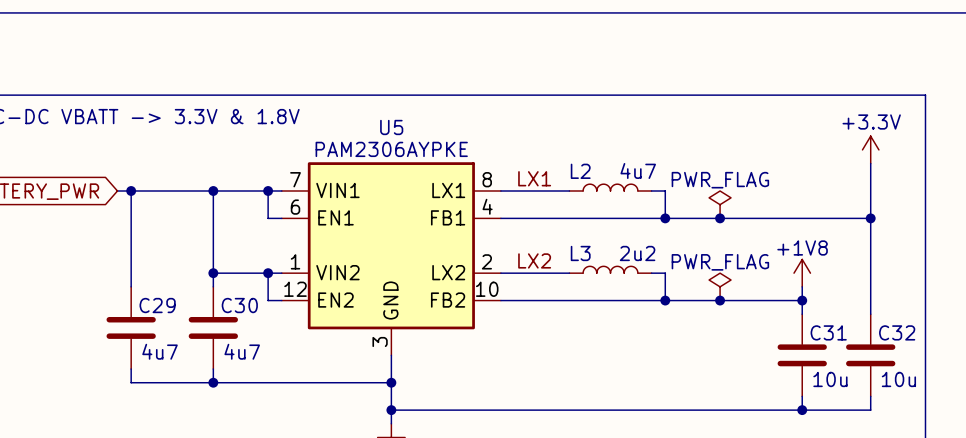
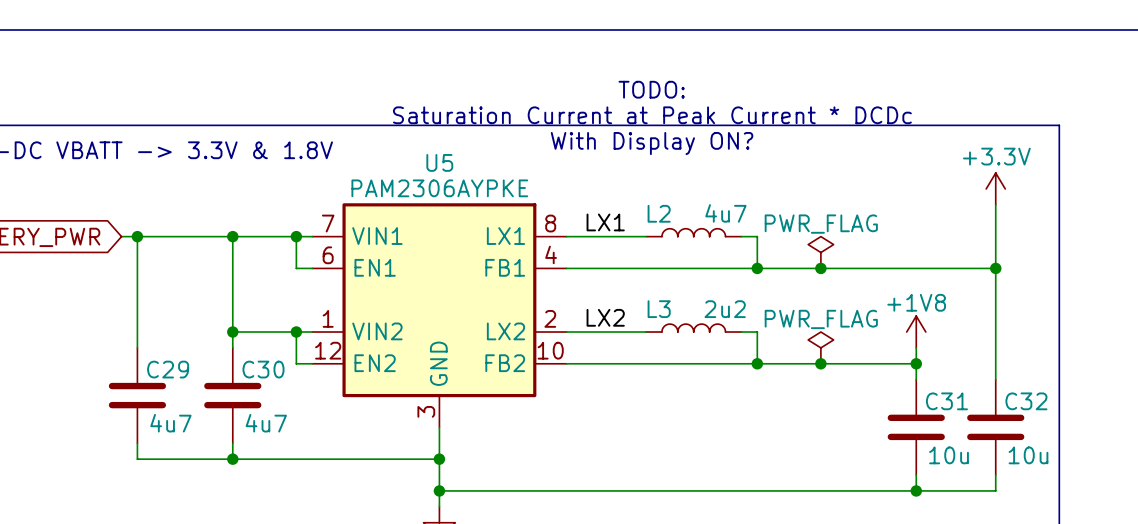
text: none -> TODO: (651, 89)
text: none -> Saturation Current at Peak Current * DCDc (652, 115)
text: none -> With Display ON? (652, 143)

